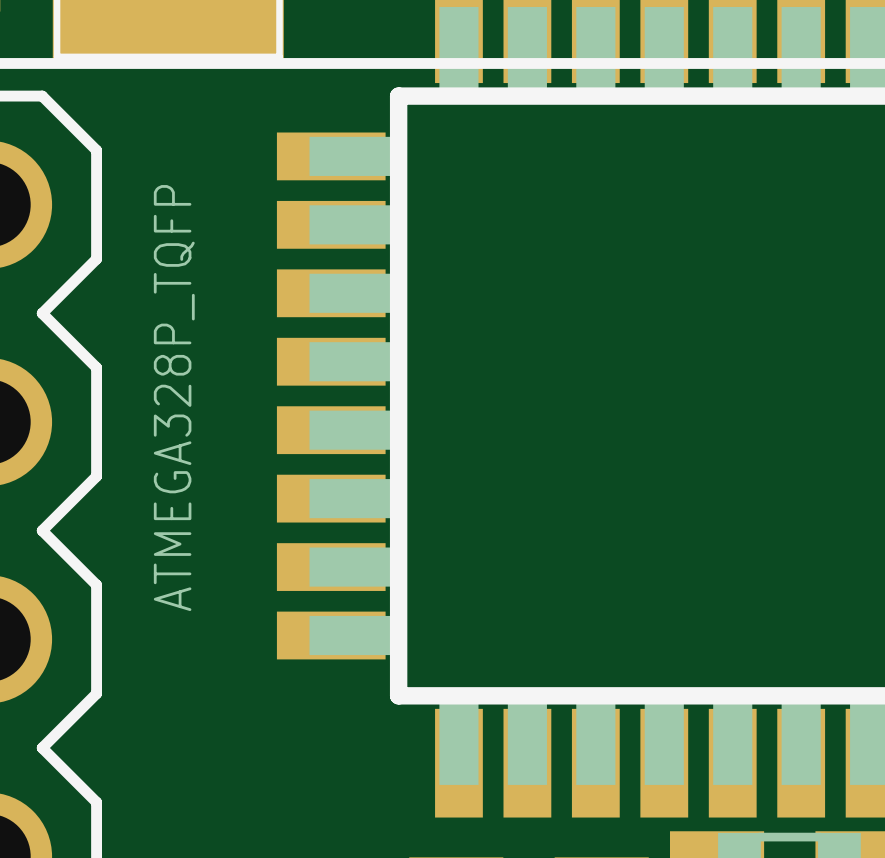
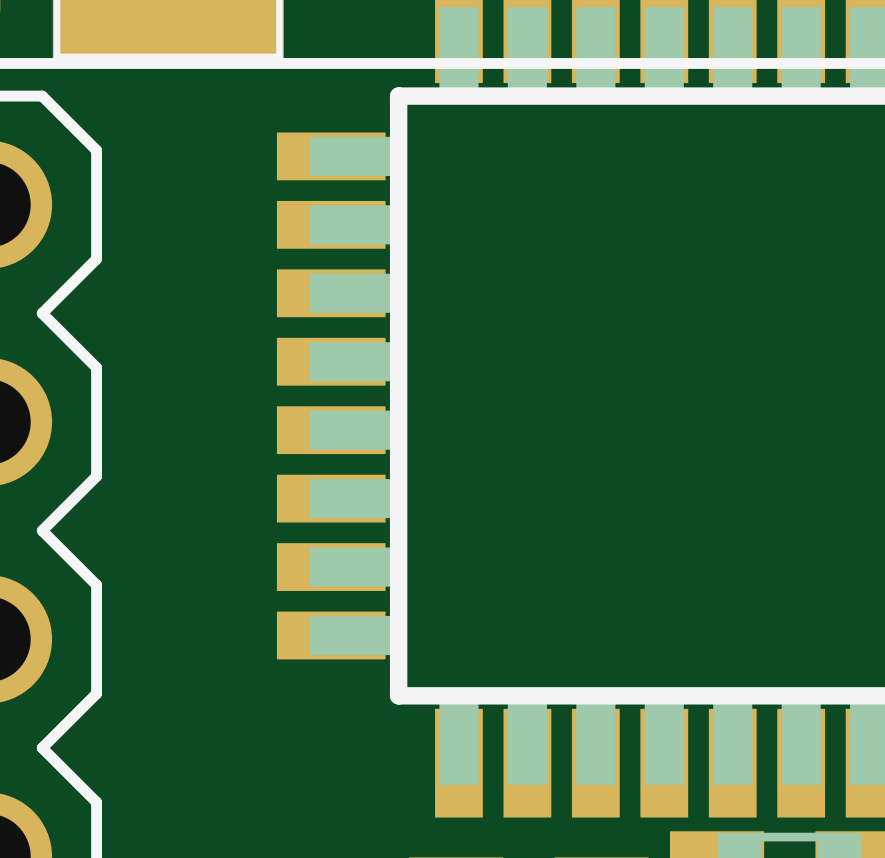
part value: ATMEGA328P_TQFP (174, 398) -> none

